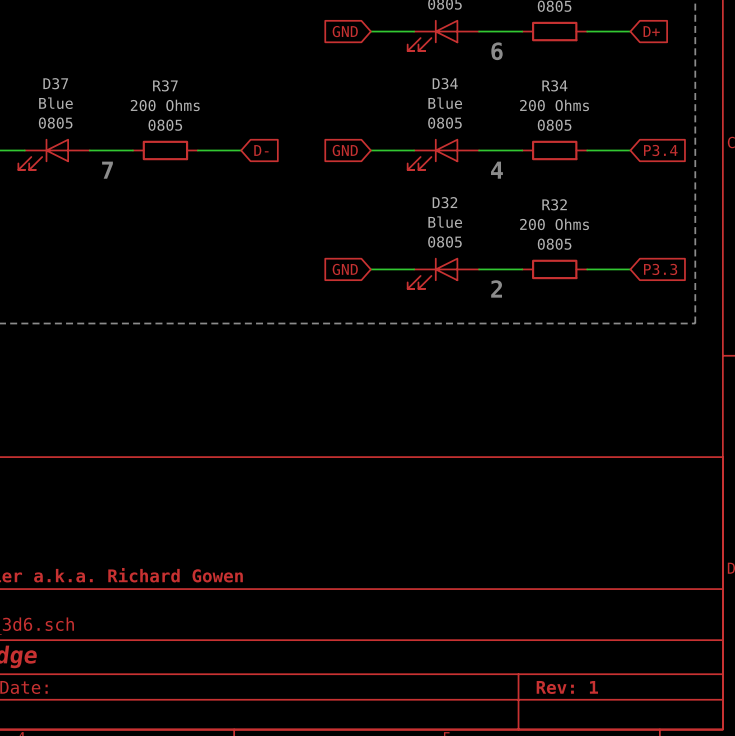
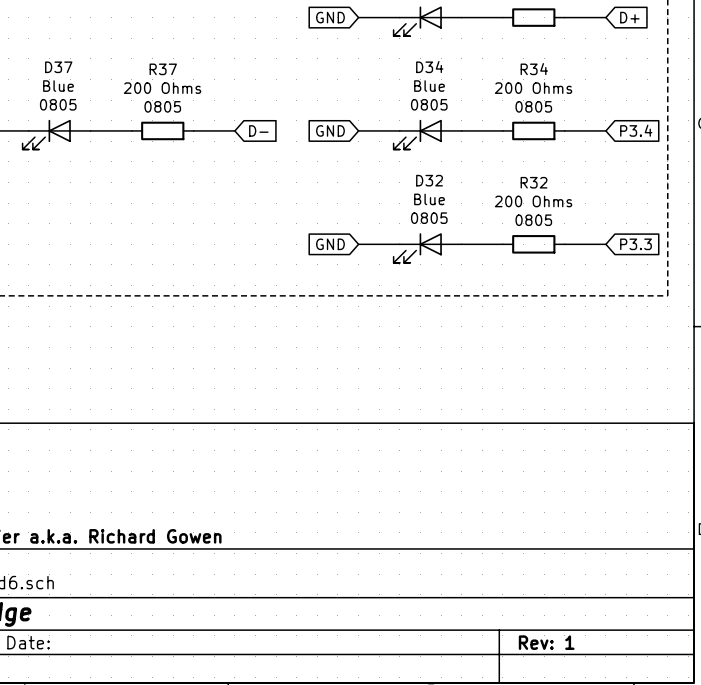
text: 6 (497, 51) -> none
text: 7 (107, 170) -> none
text: 4 (496, 170) -> none
text: 2 (496, 288) -> none

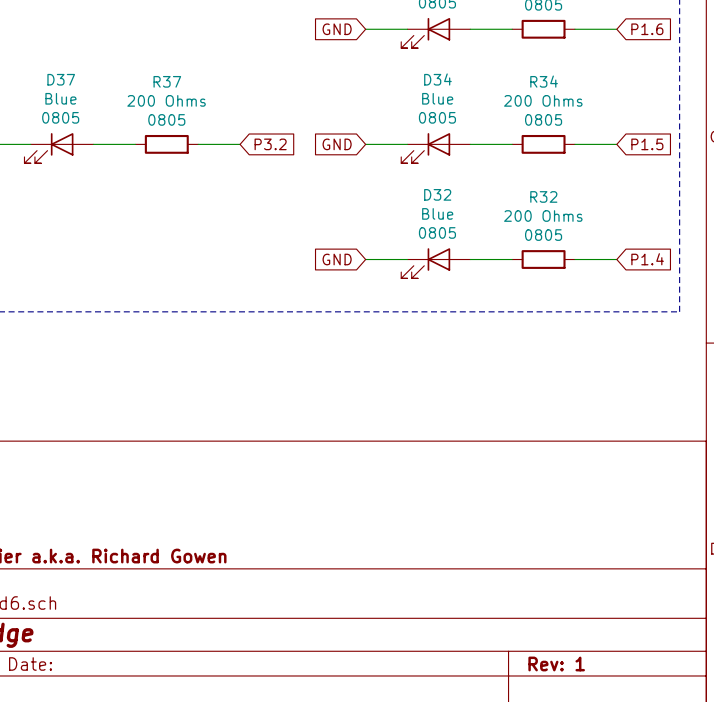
global label: D+ (629, 17) -> P1.6 (647, 29)
global label: D- (258, 130) -> P3.2 (270, 144)
global label: P3.4 (636, 130) -> P1.5 (647, 144)
global label: P3.3 (636, 244) -> P1.4 (647, 259)

